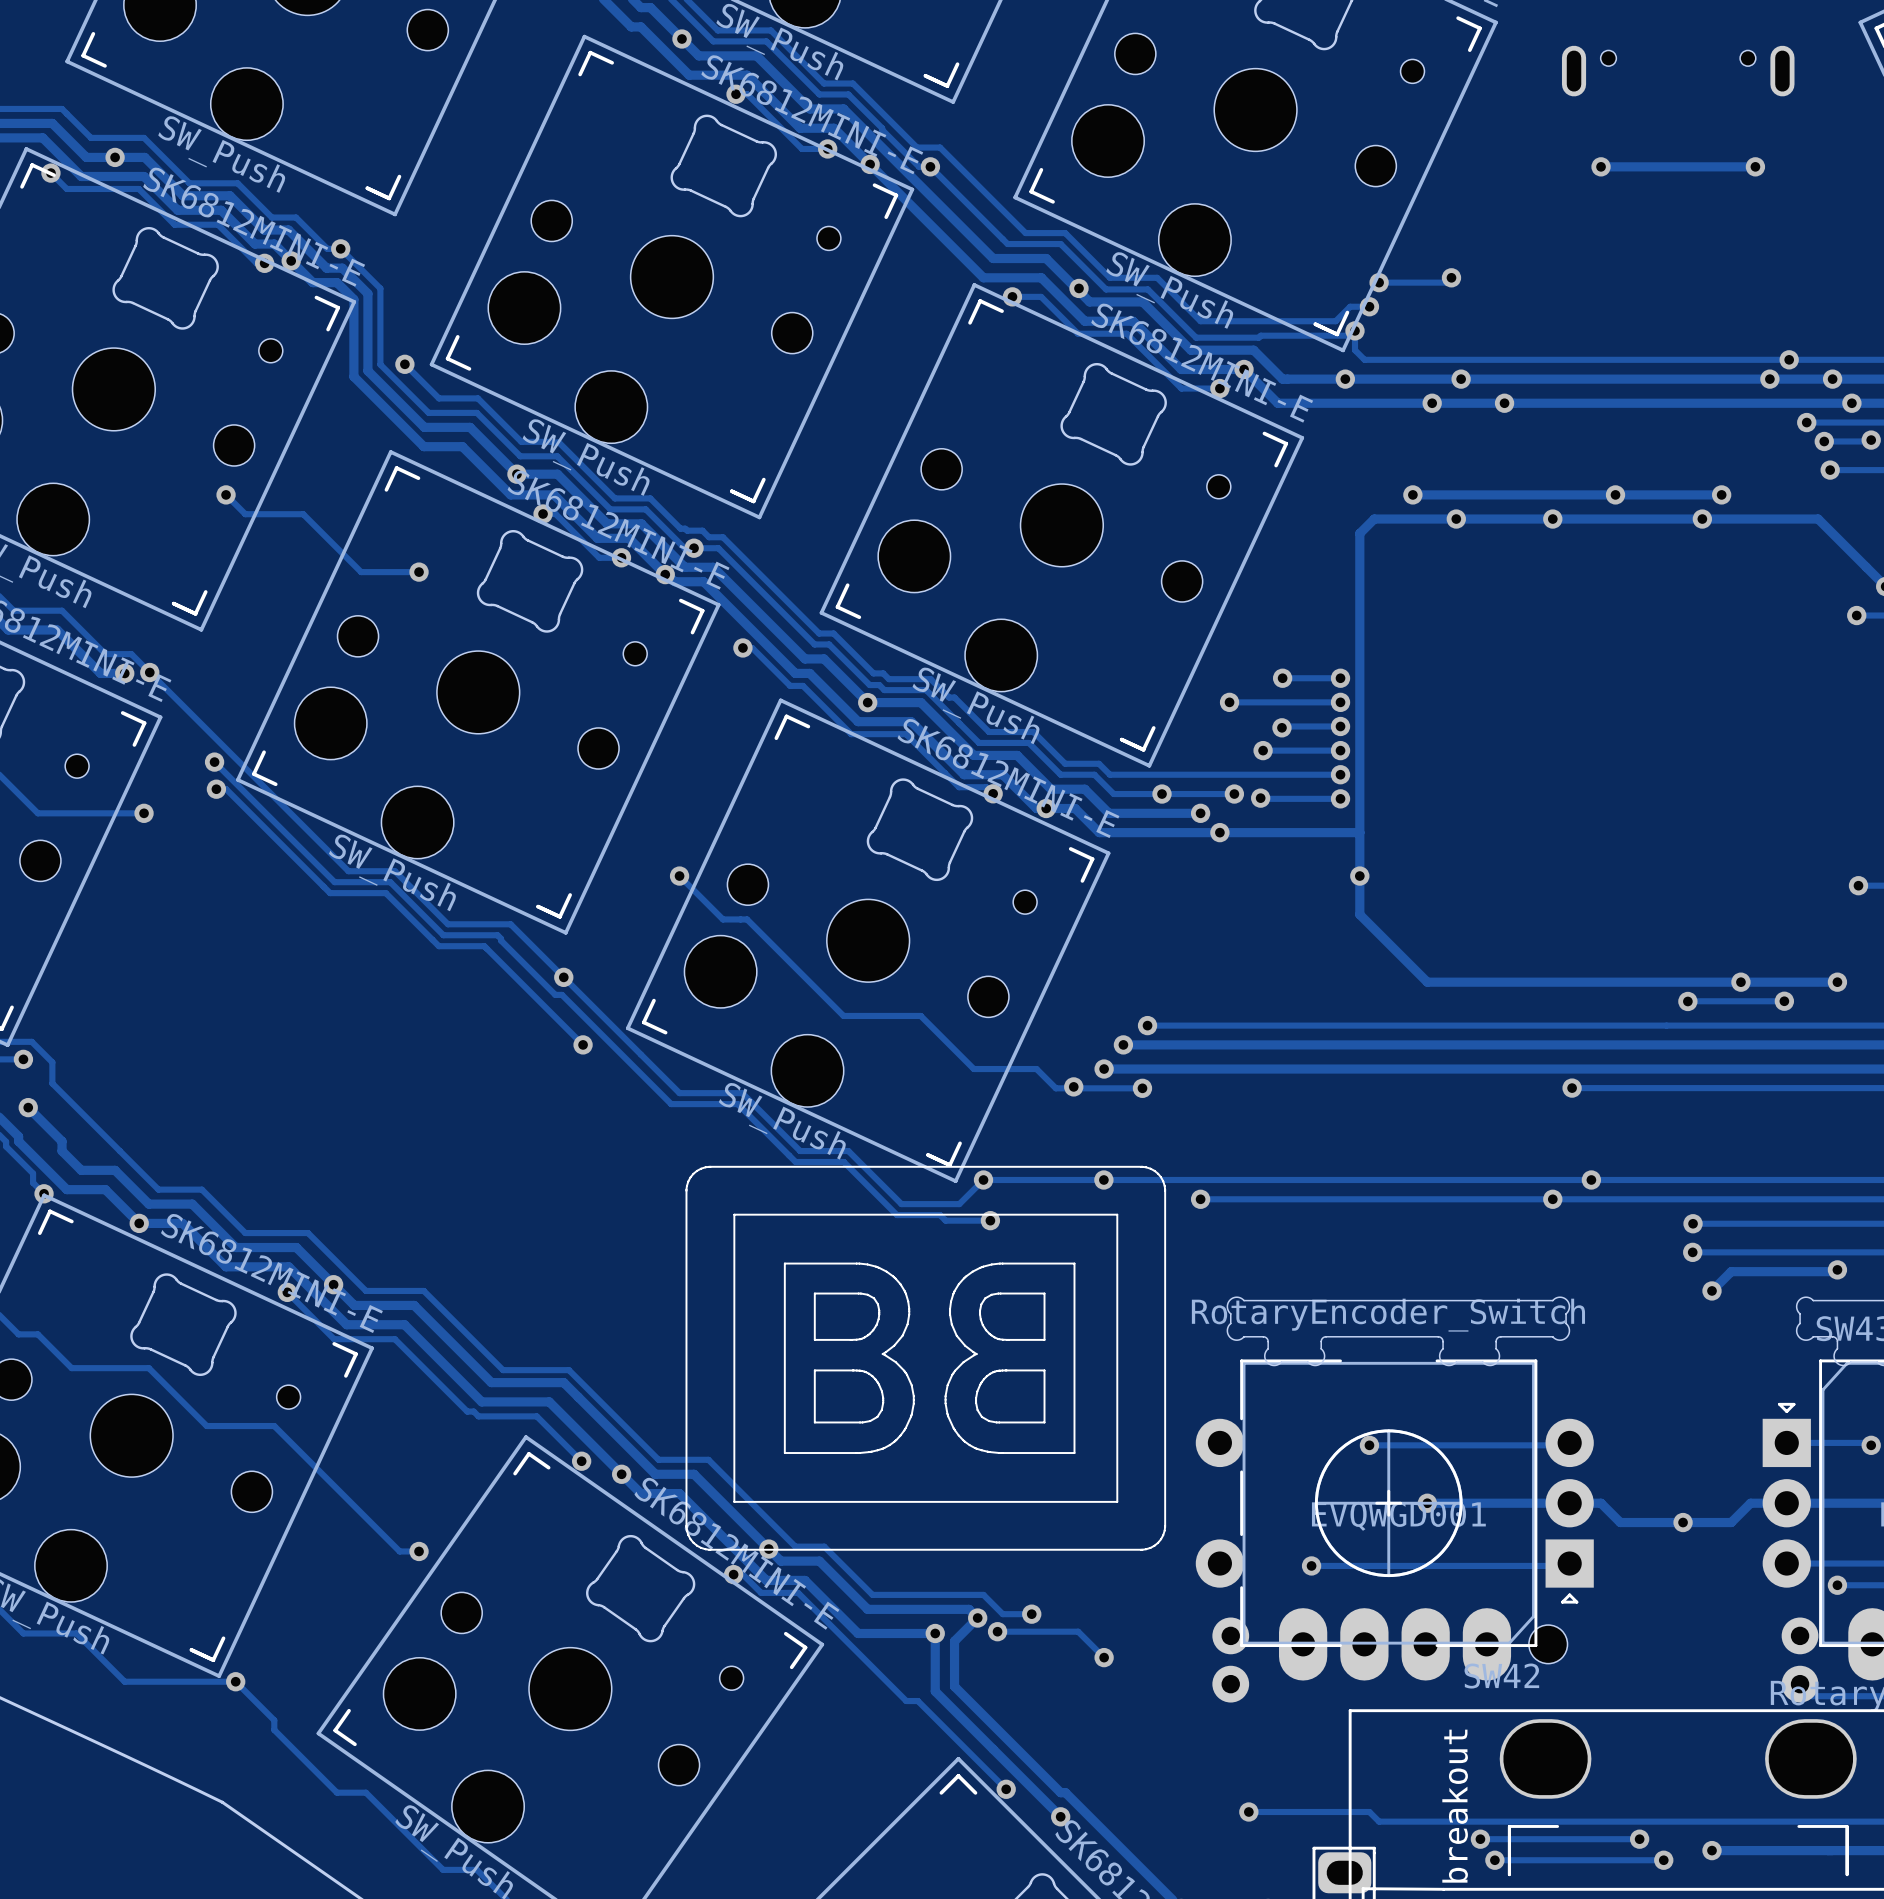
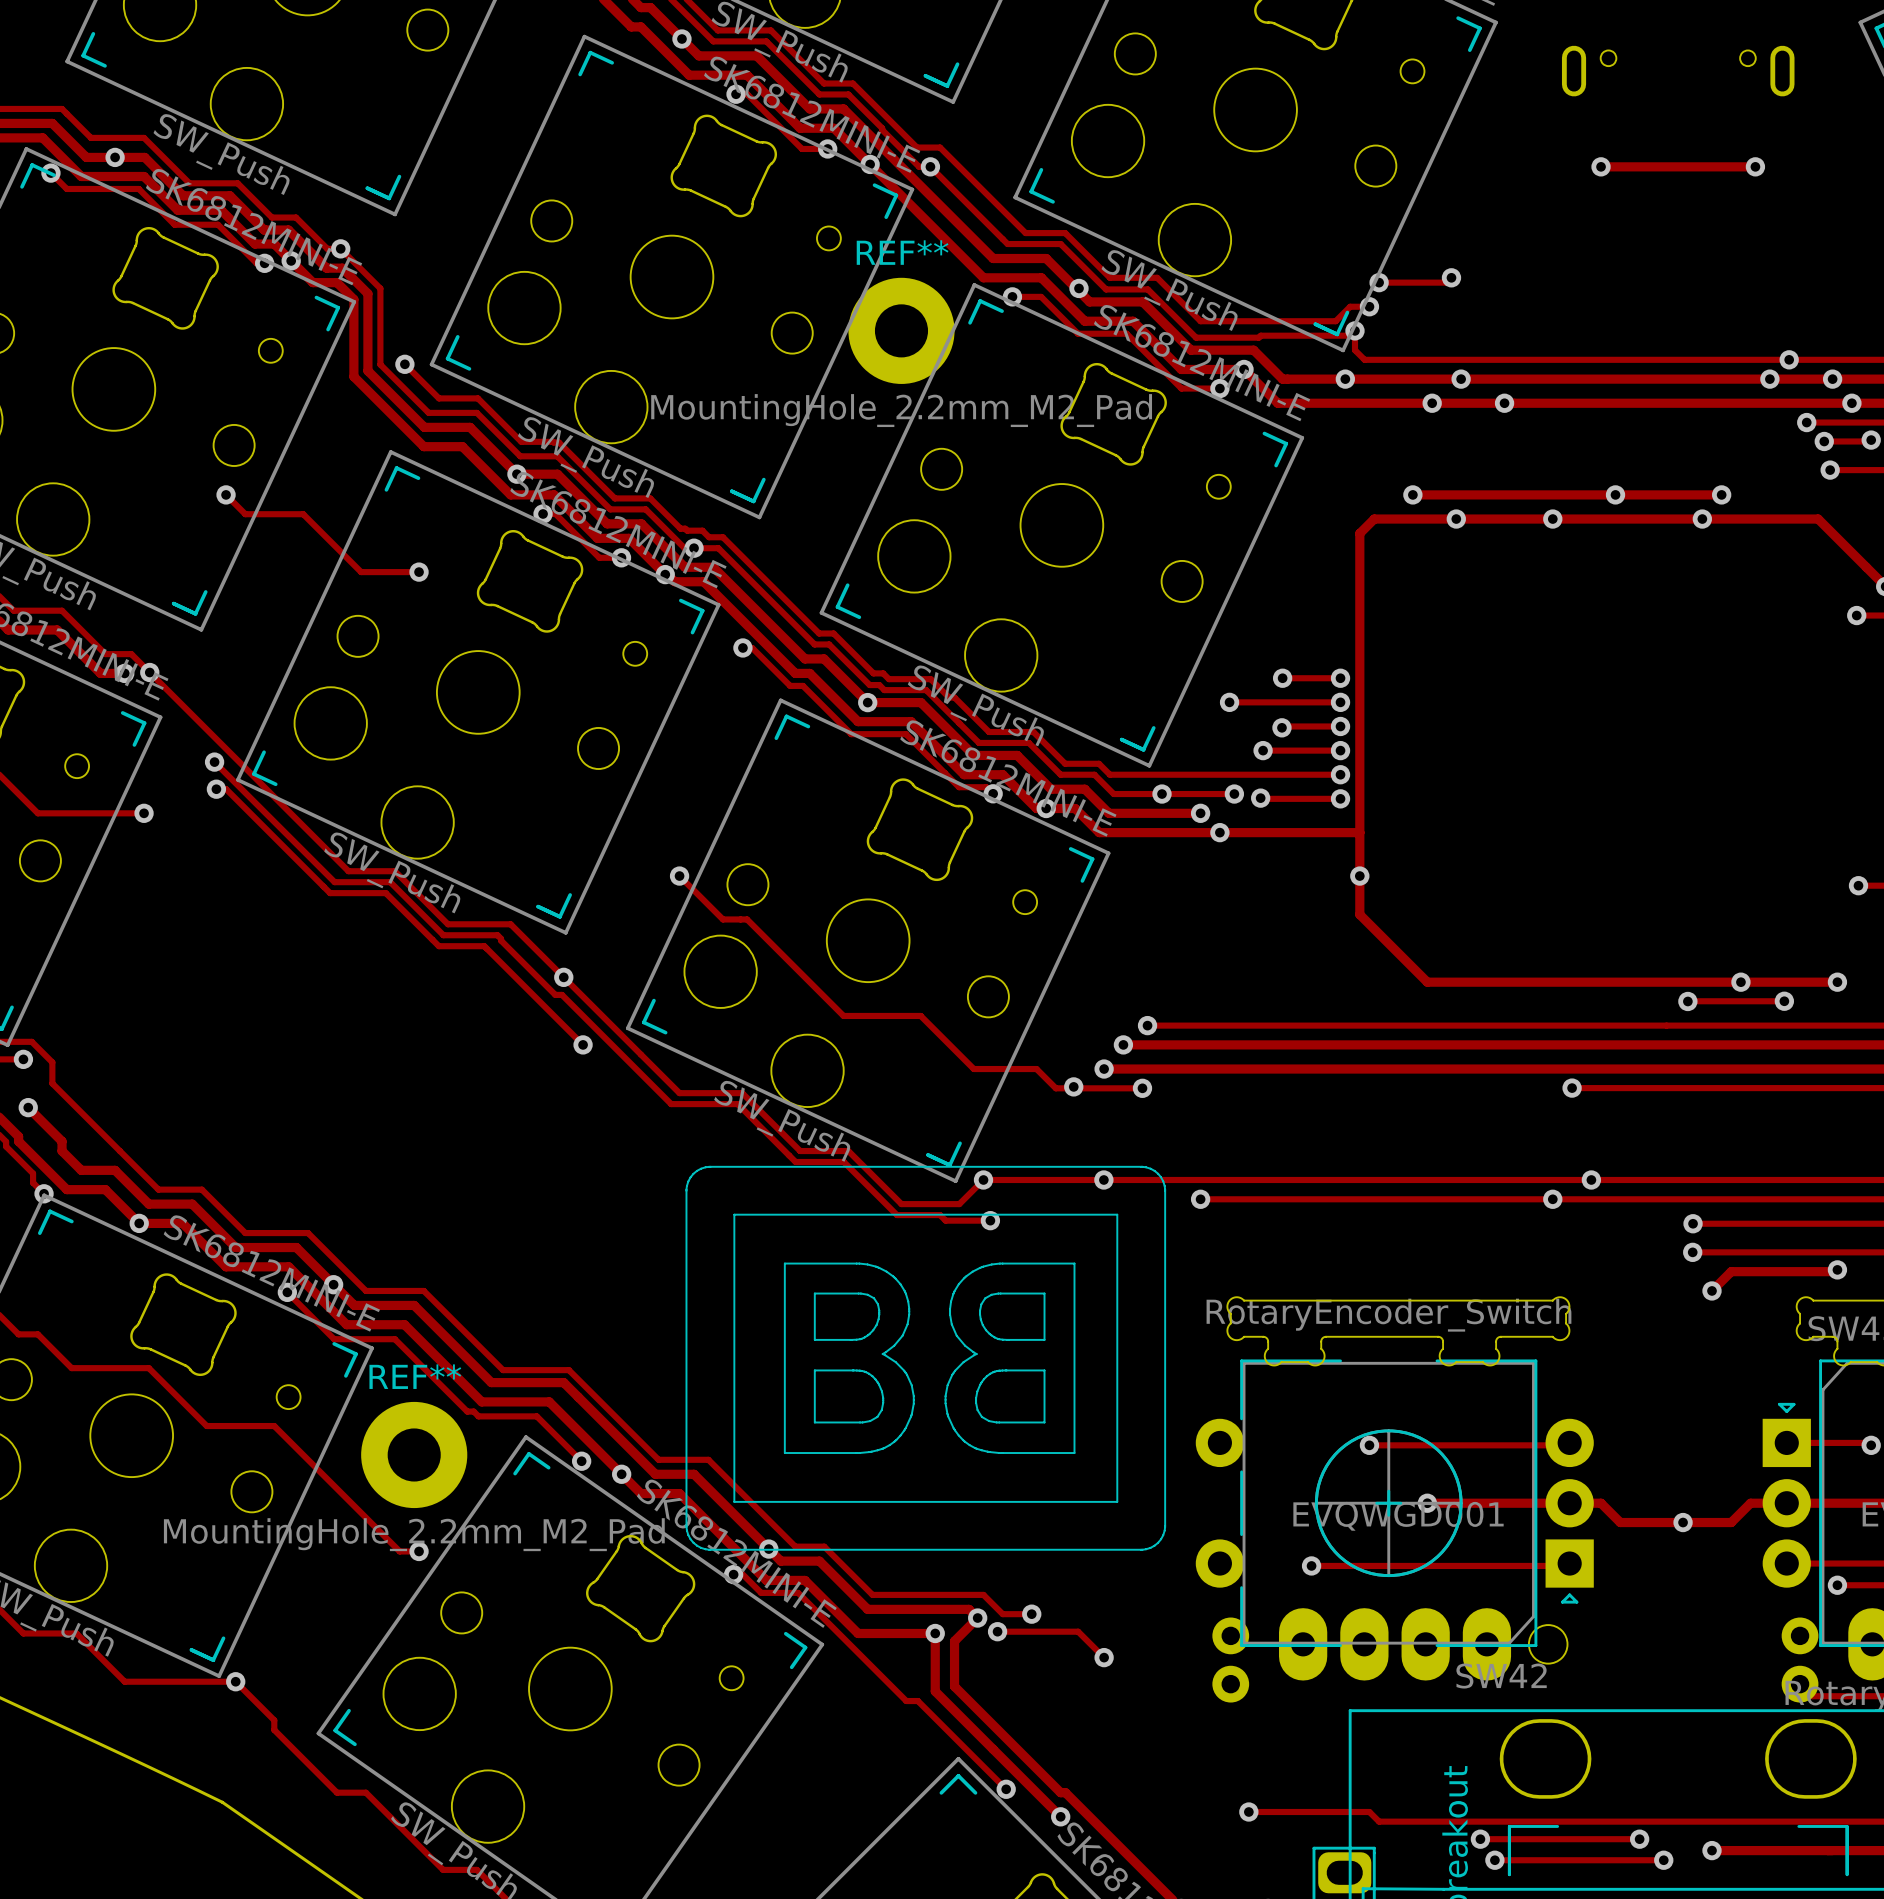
REF**: none -> MountingHole_2.2mm_M2_Pad (901, 330)
REF**: none -> MountingHole_2.2mm_M2_Pad (414, 1454)

